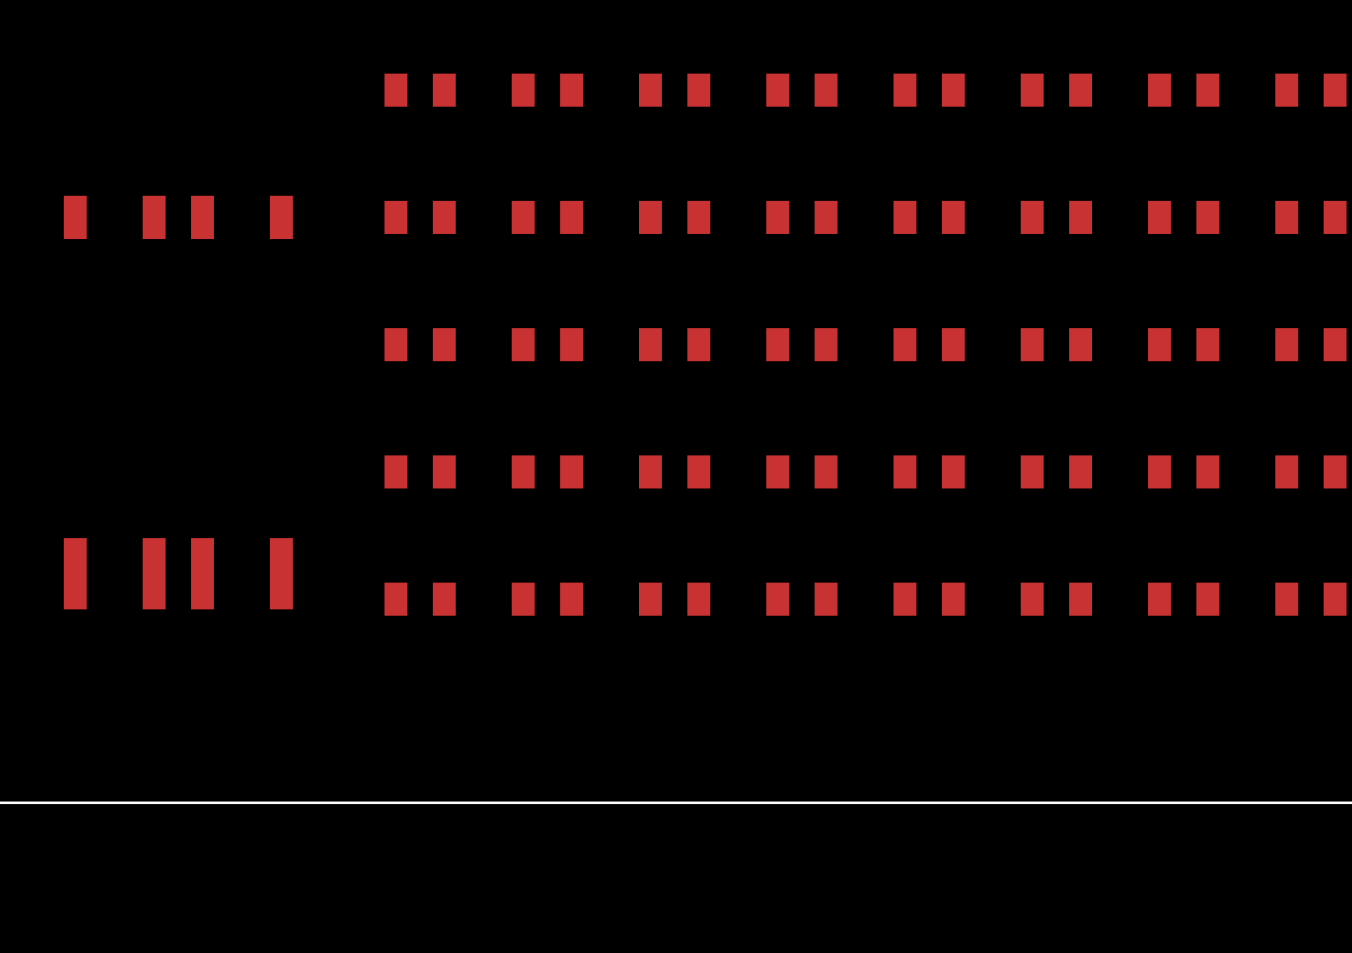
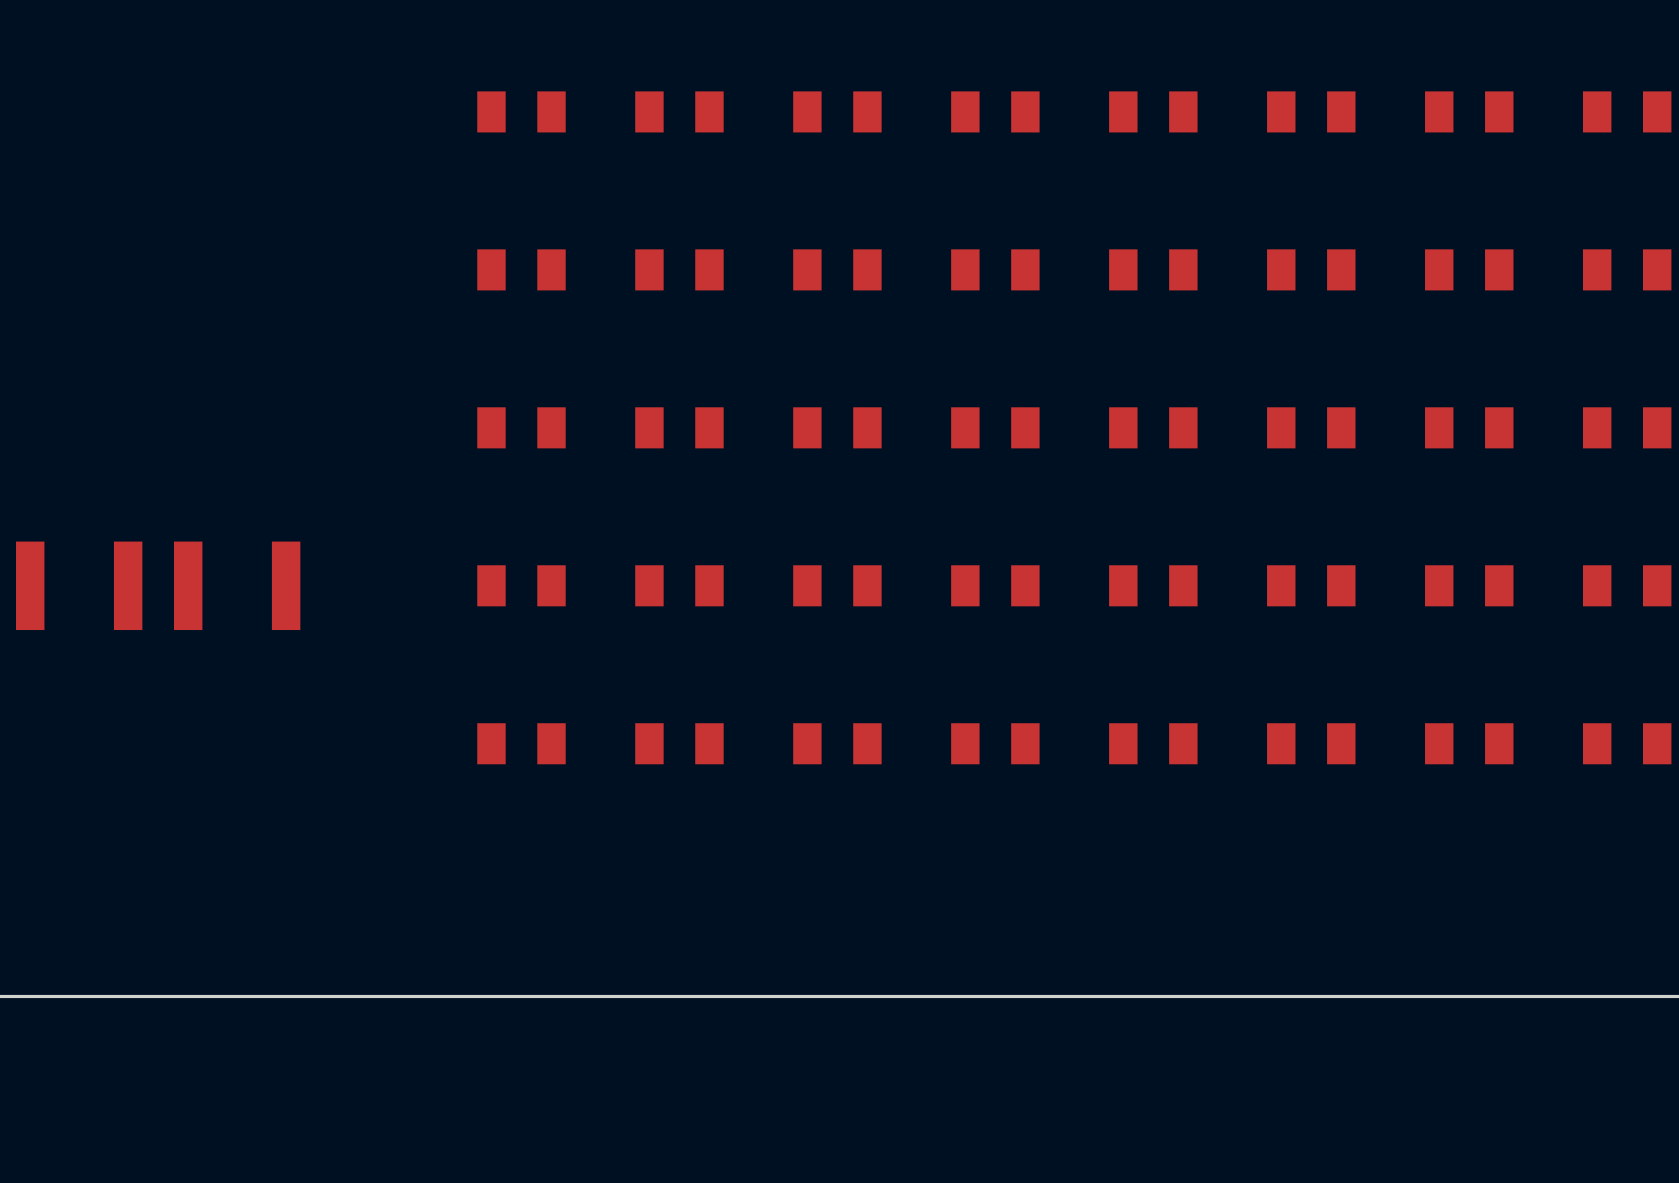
part: (114, 217) -> none
part: (241, 217) -> none
part: none -> (79, 585)
part: none -> (237, 585)
part: (114, 573) -> none
part: (241, 573) -> none

